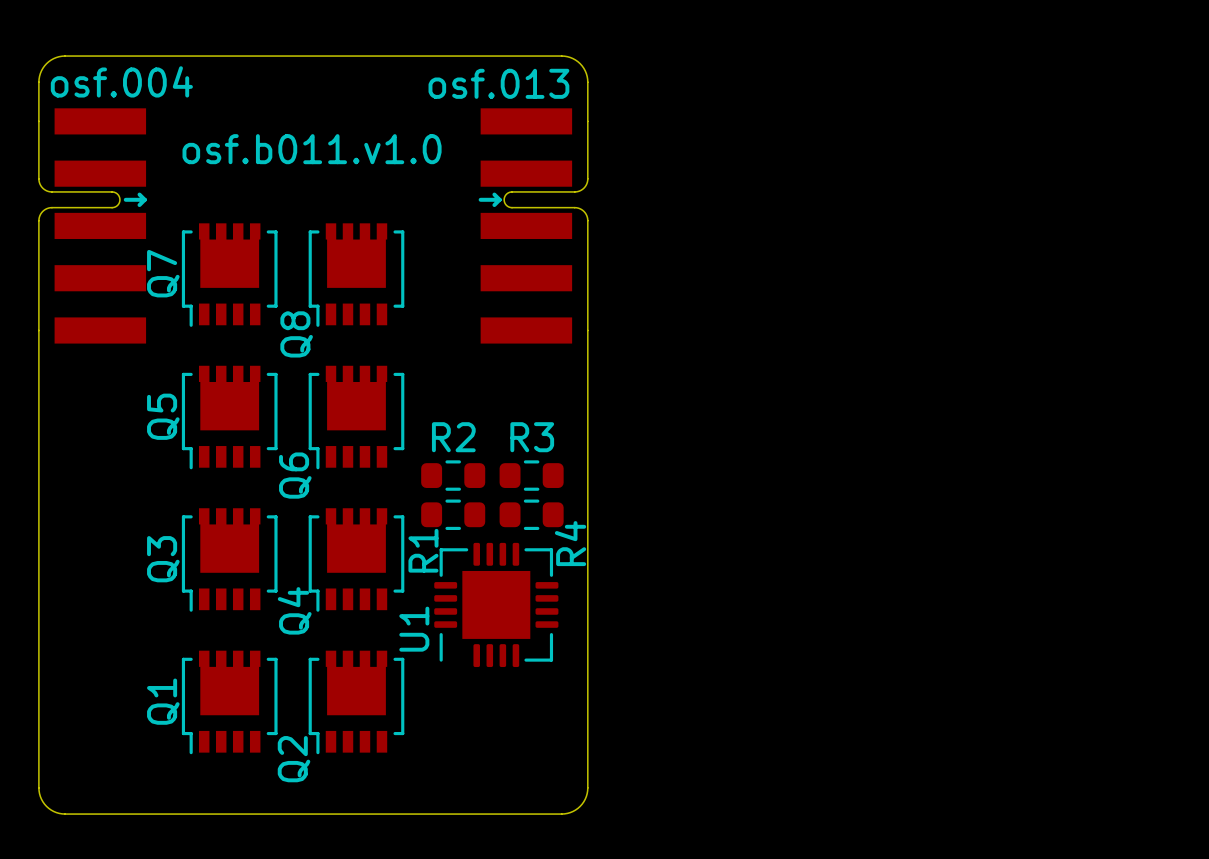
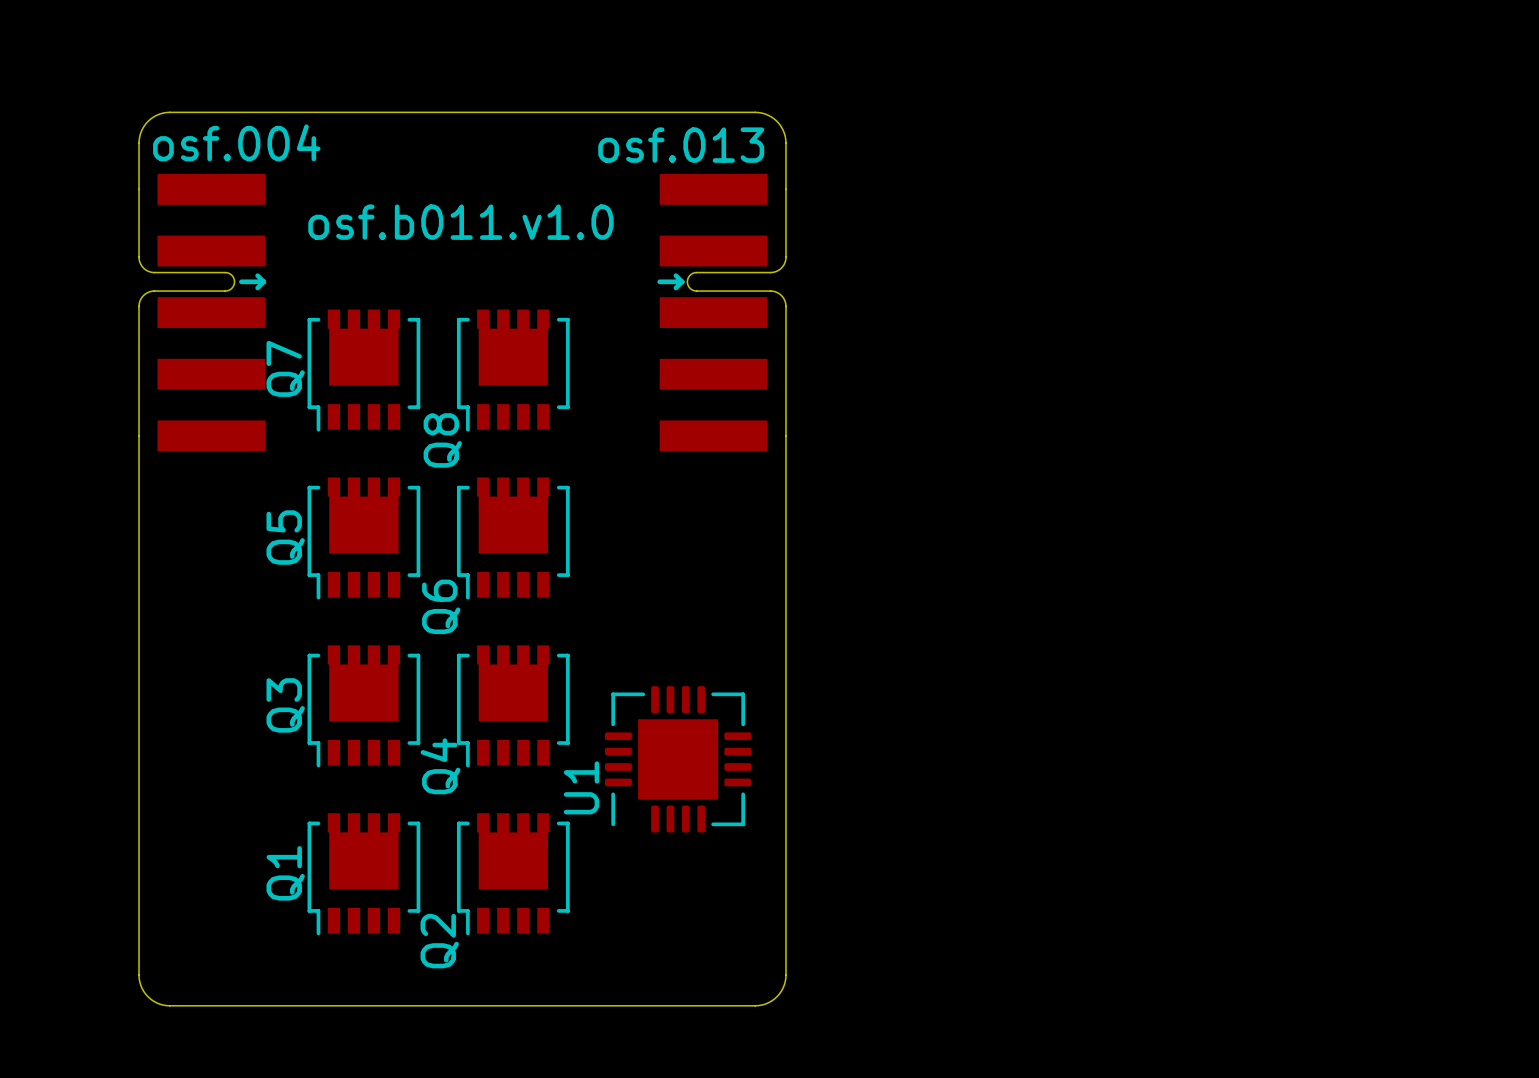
R2: (453, 475) -> none
R3: (531, 475) -> none
R1: (453, 514) -> none
R4: (531, 514) -> none

